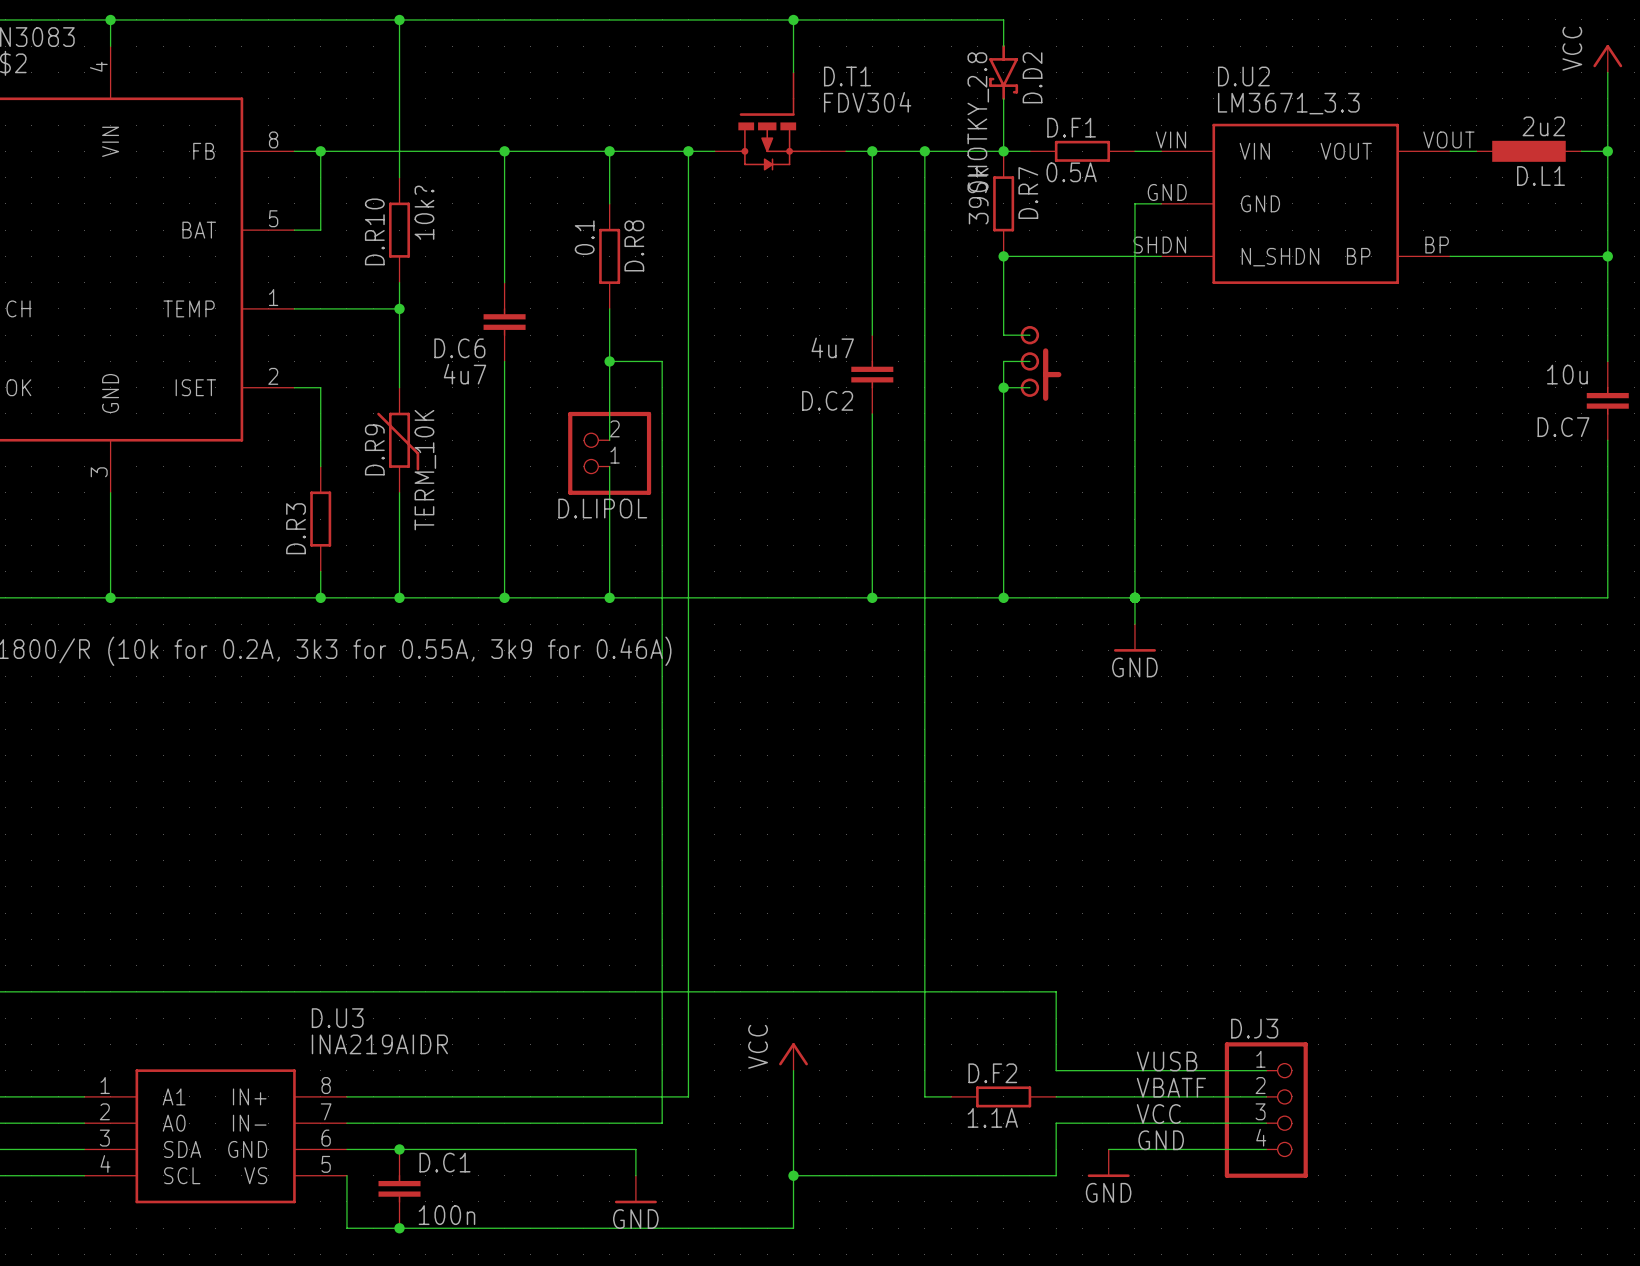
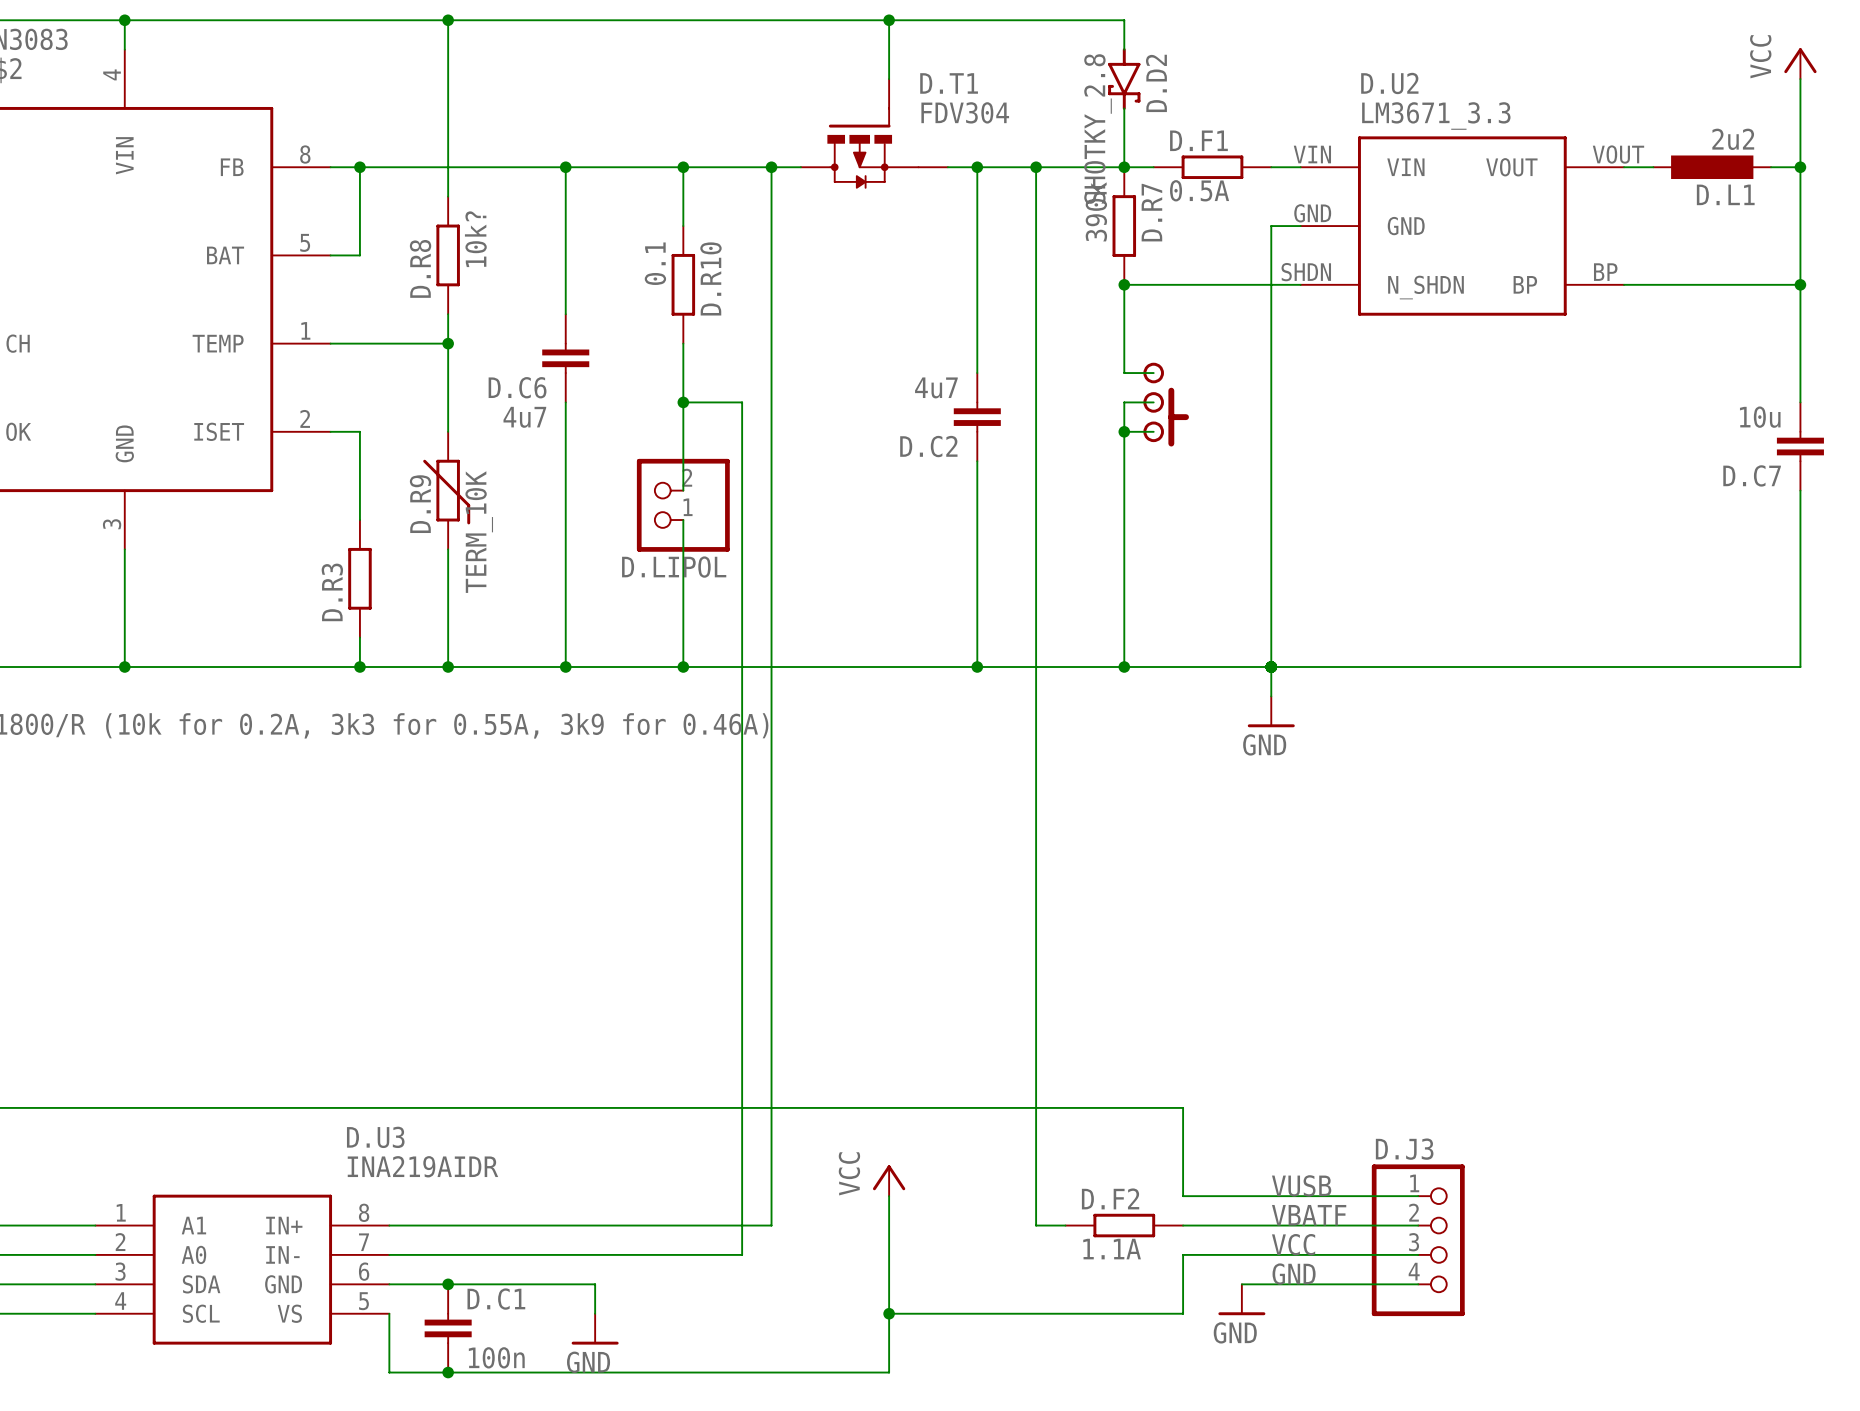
D.R10 name: D.R10 (374, 231) -> D.R8 (420, 268)
D.R8 name: D.R8 (634, 245) -> D.R10 (710, 278)
wire: (530, 1149) (635, 1149) (635, 1175) -> (595, 1284) (595, 1313)
power symbol position: GND (635, 1189) -> GND (595, 1329)

